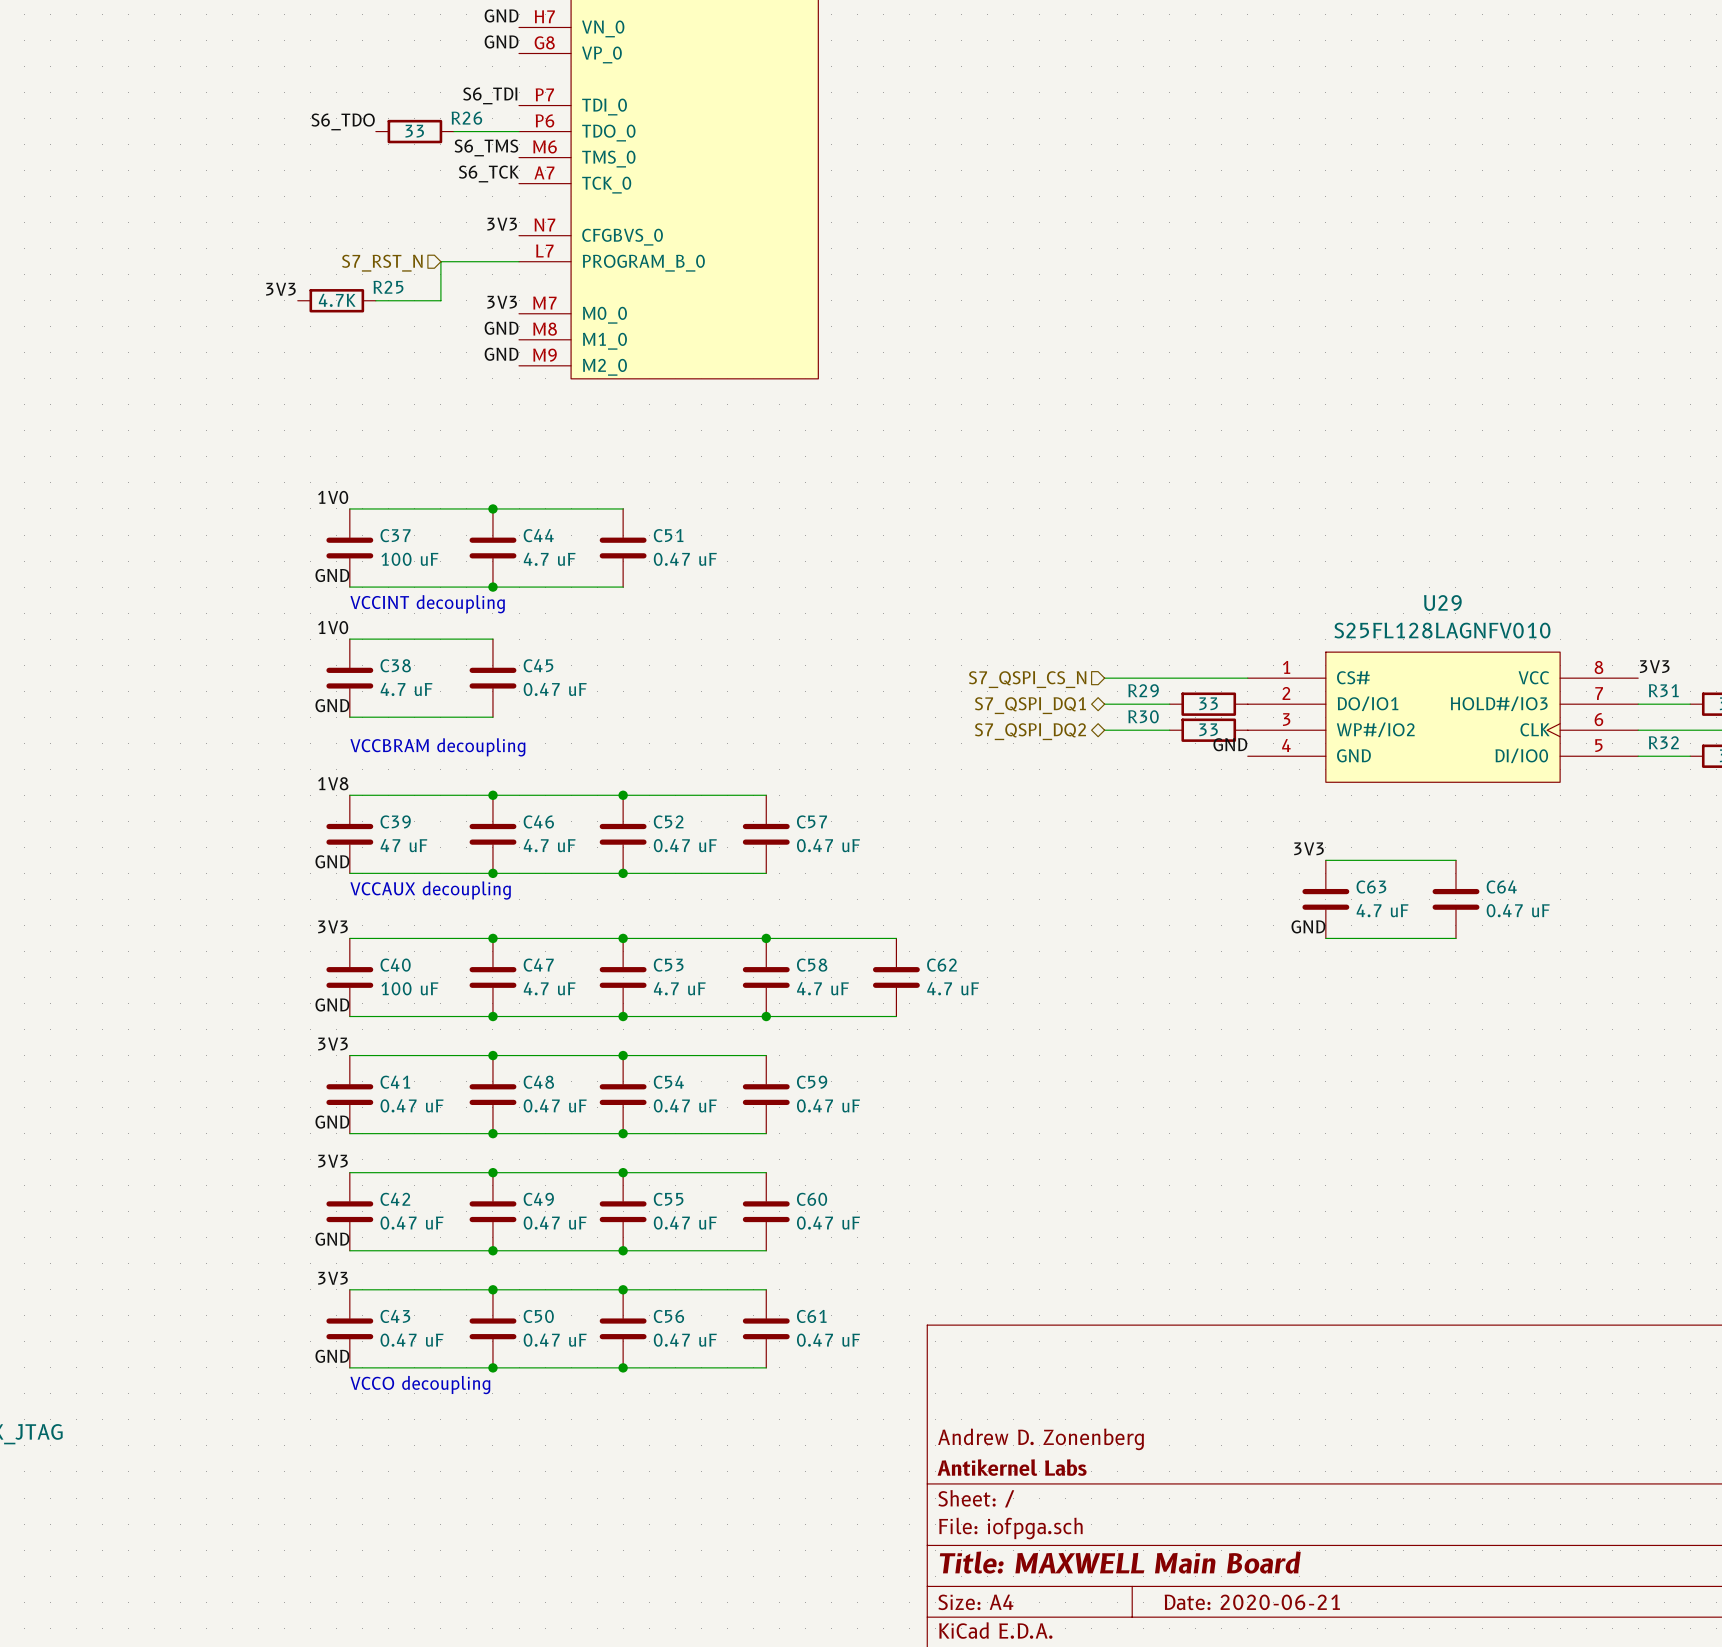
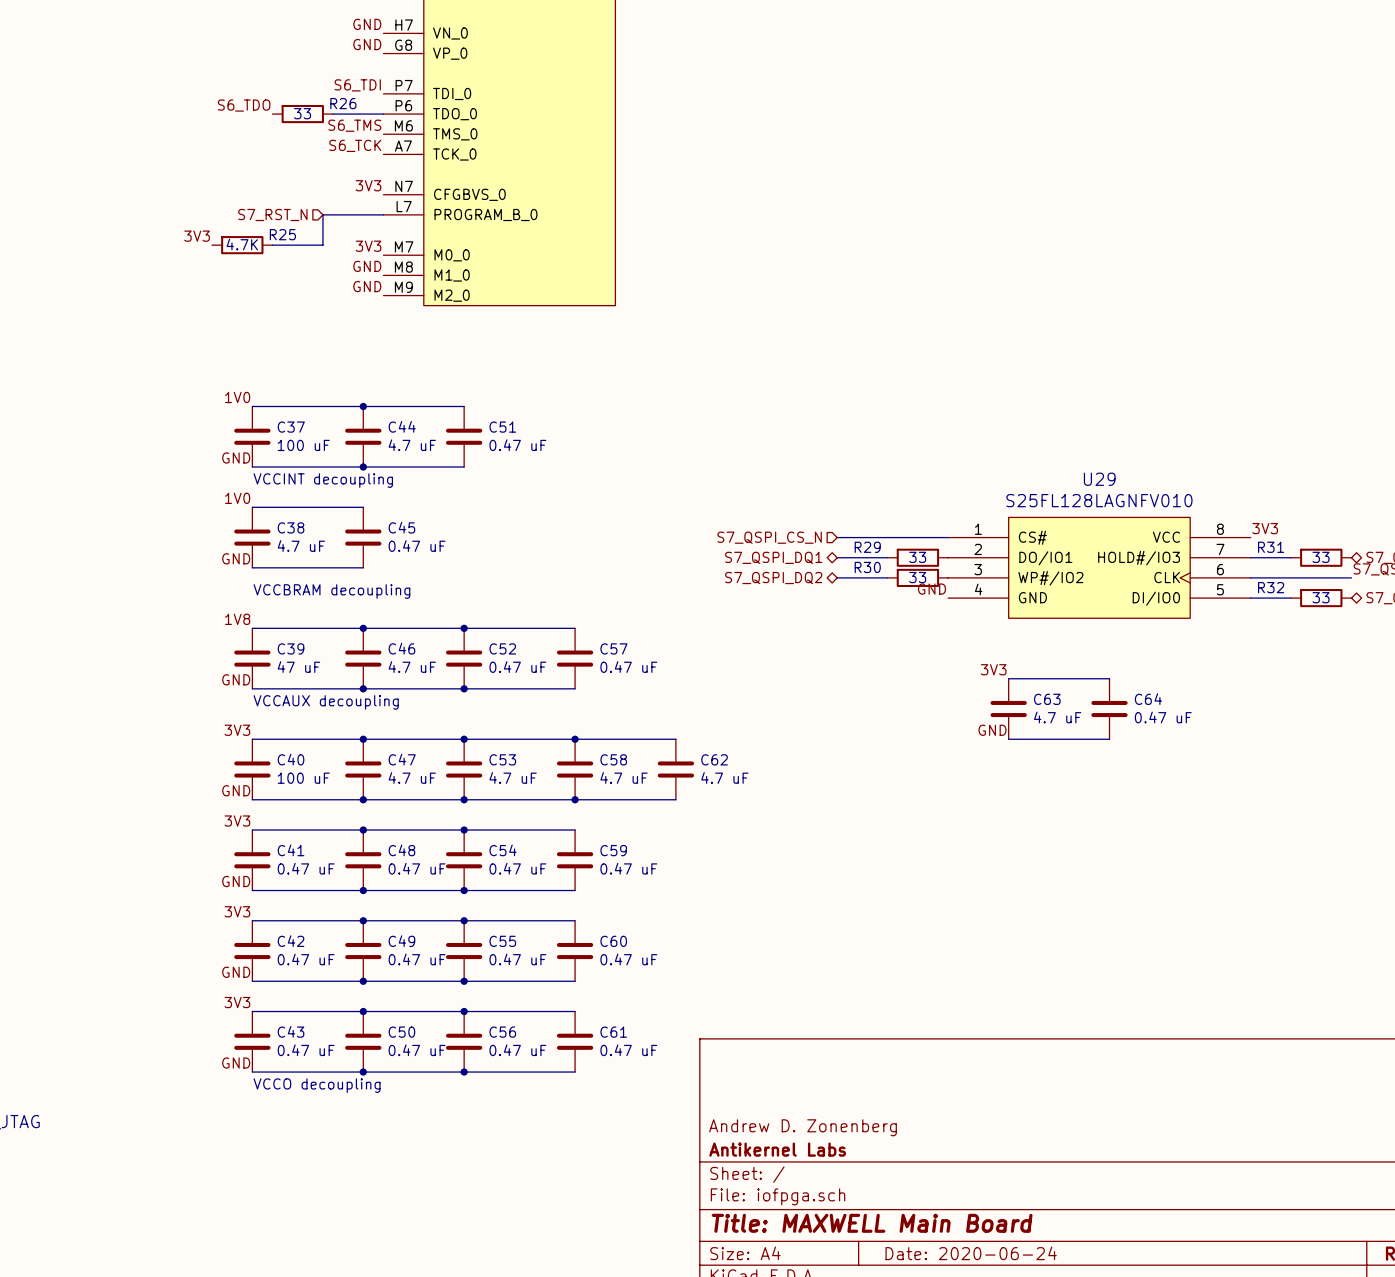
title block: Date: 2020-06-21 (1252, 1602) -> Date: 2020-06-24 (971, 1253)

